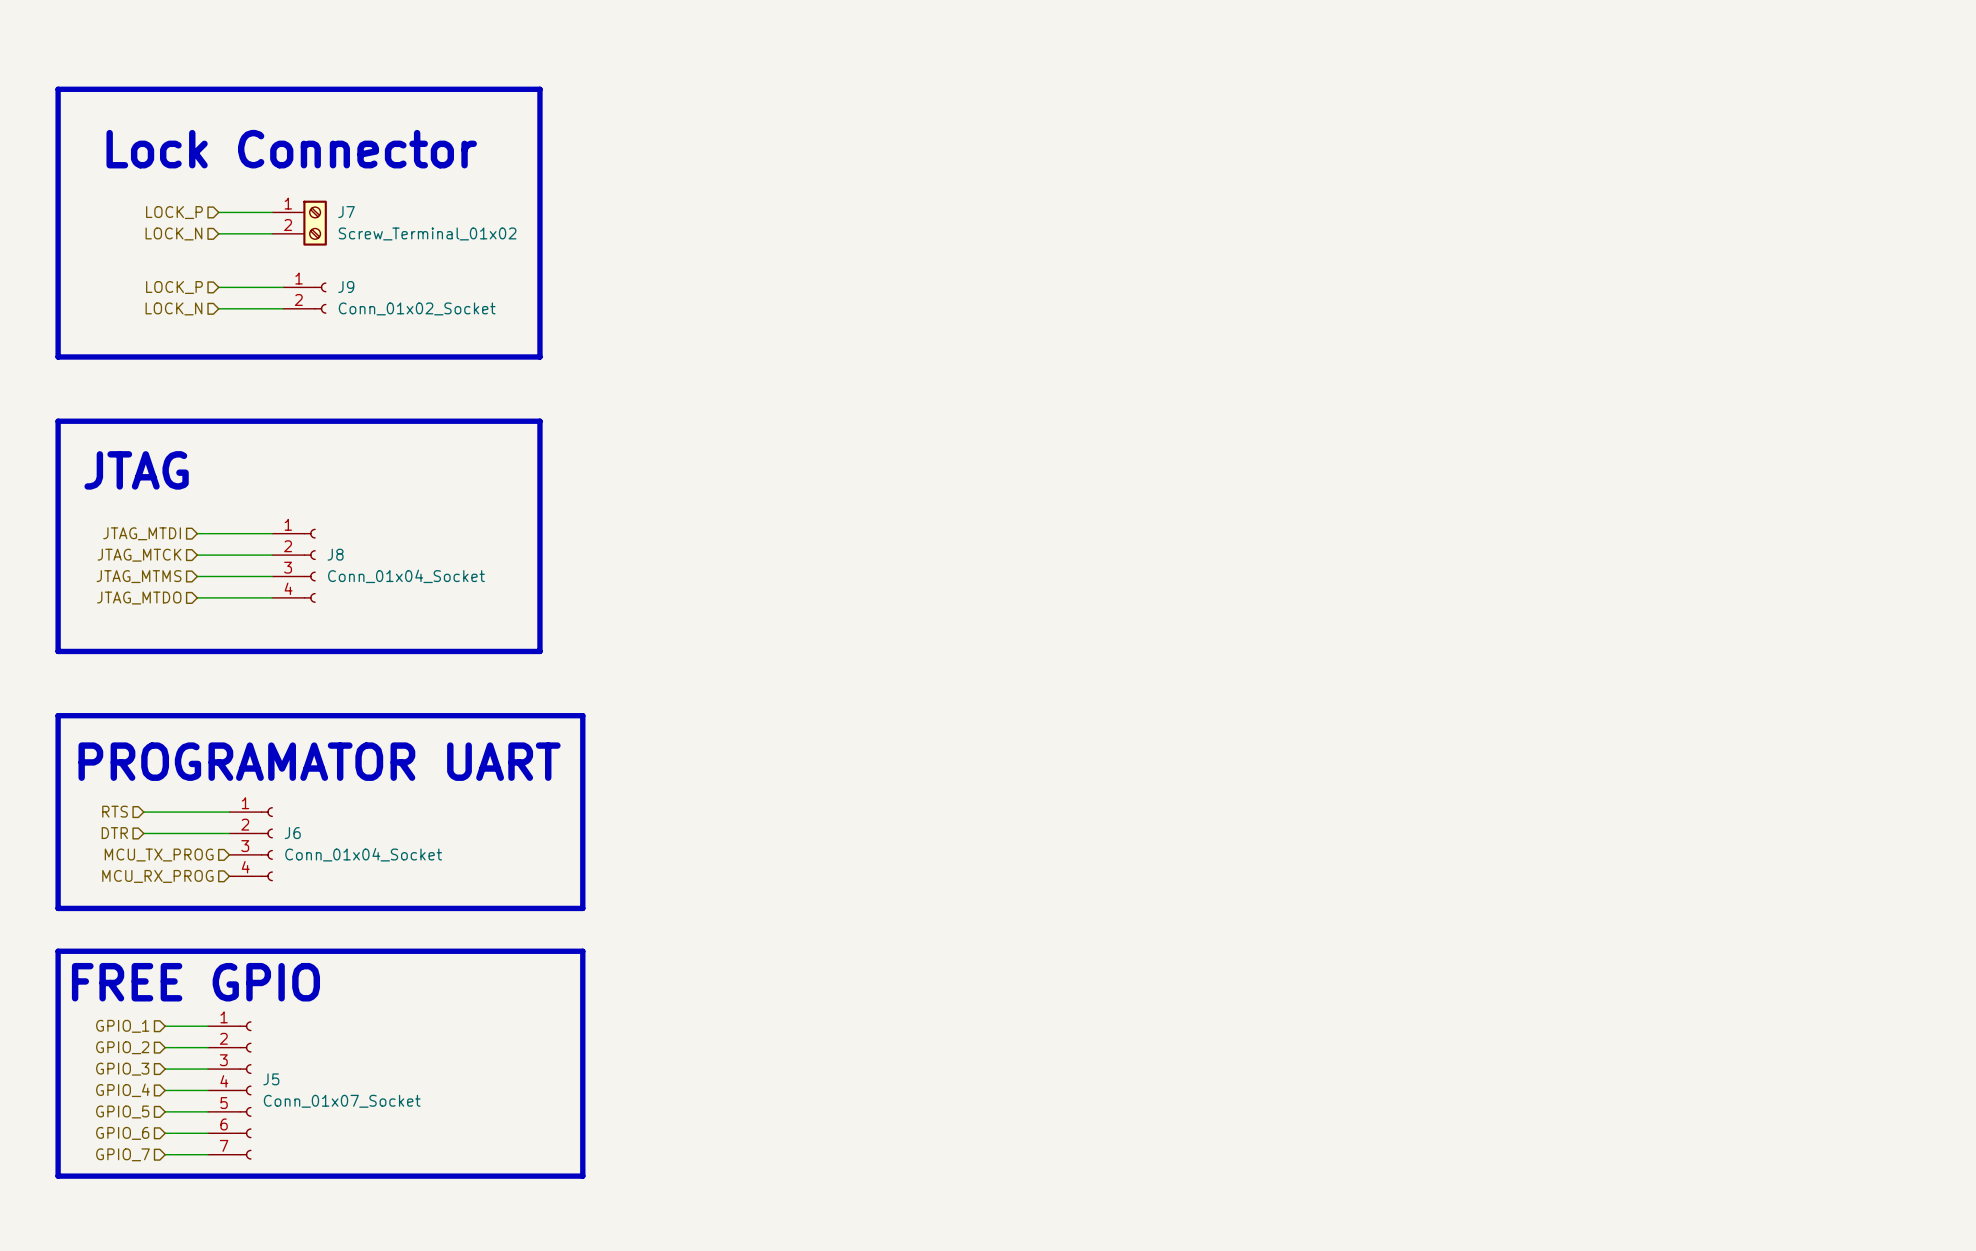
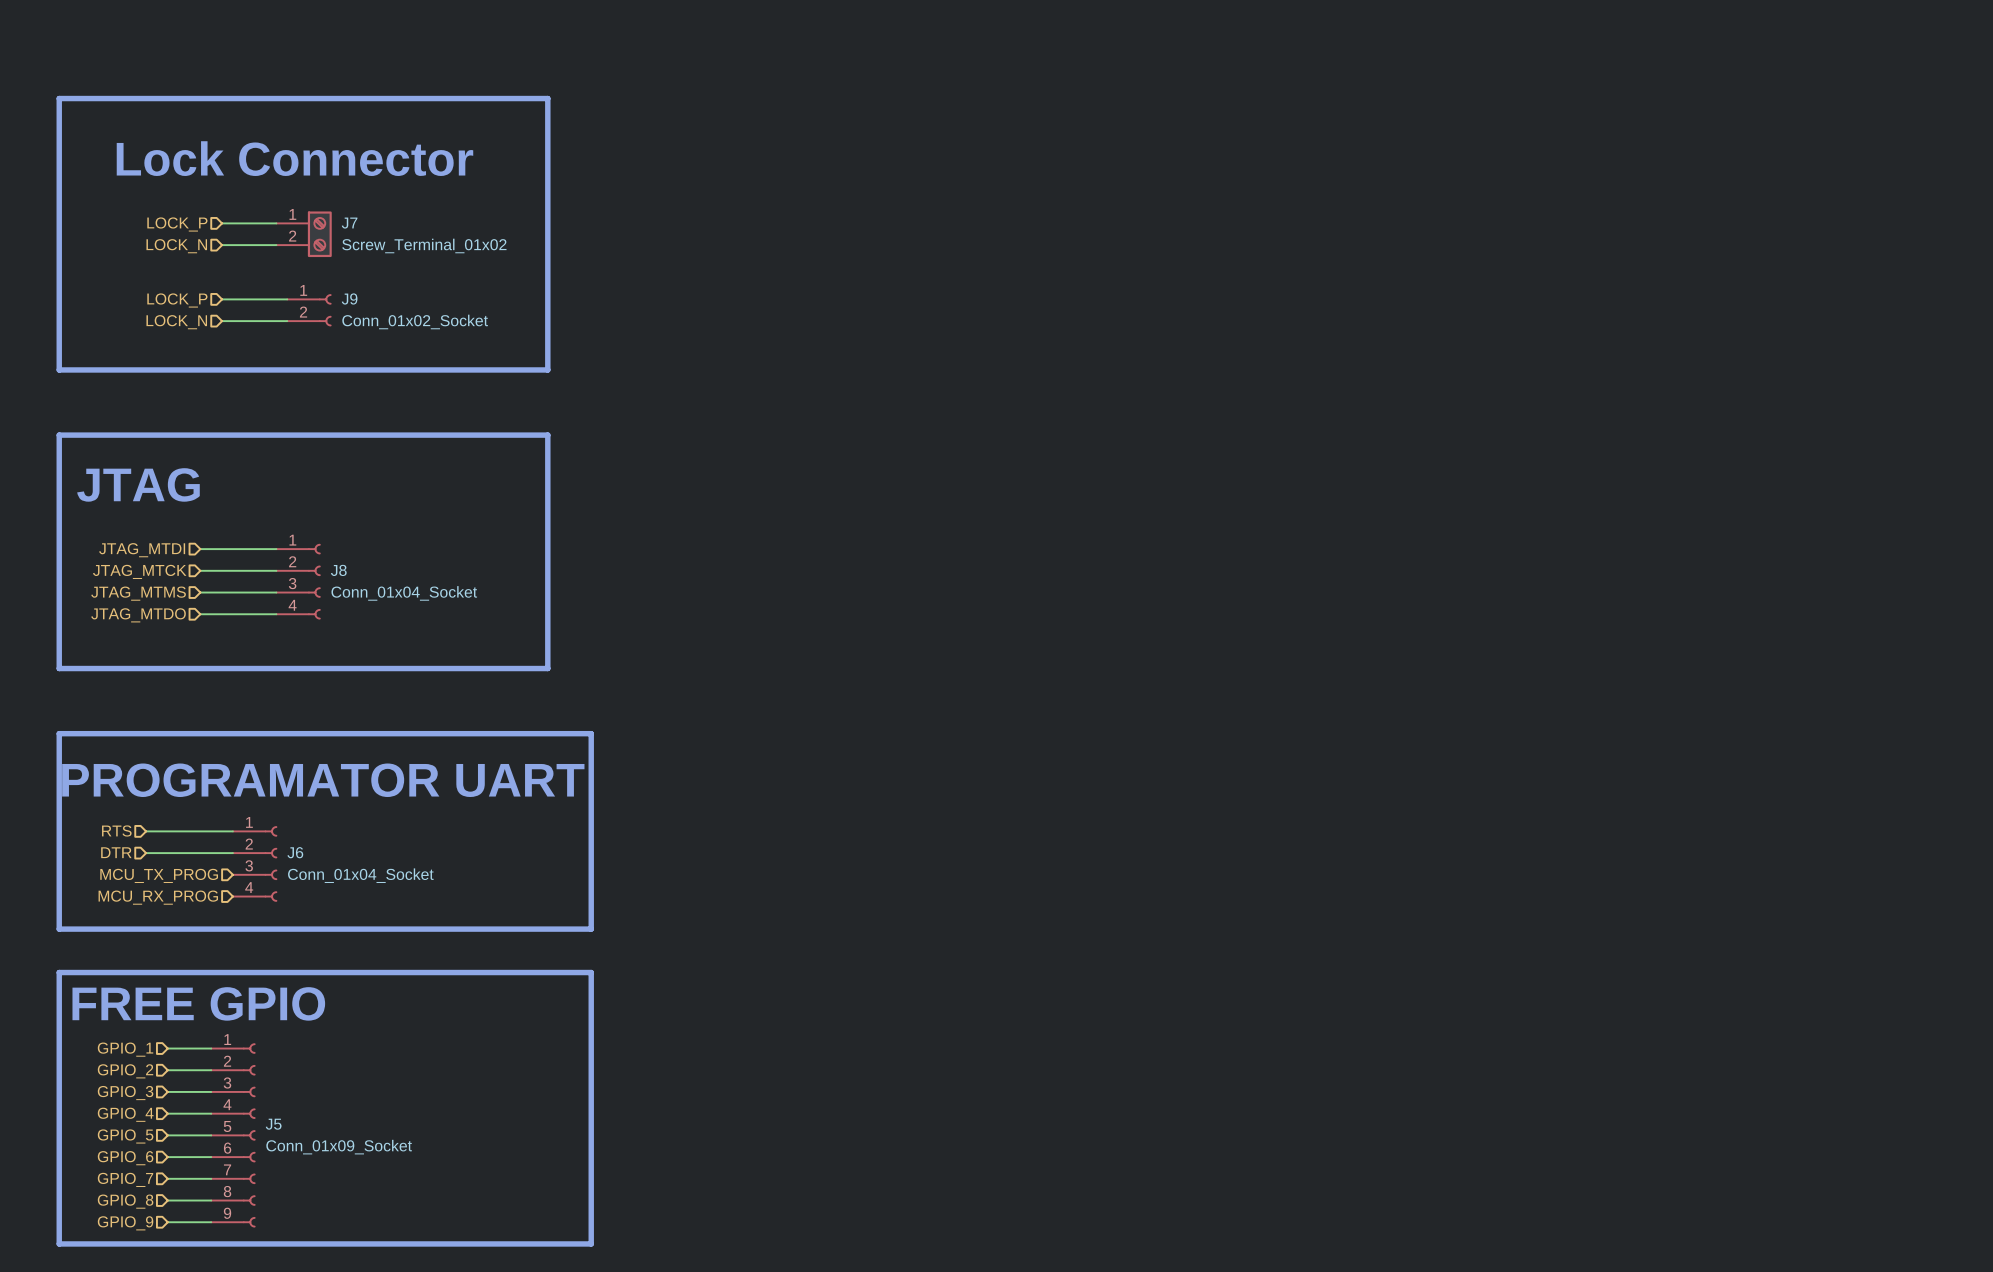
J5 symbol: [208, 1021, 252, 1160] -> [211, 1043, 256, 1228]
J5 value: Conn_01x07_Socket (342, 1101) -> Conn_01x09_Socket (339, 1147)
line: (58, 1176) (582, 1176) -> (59, 1200) (59, 1243) (591, 1243) (591, 1200)
hierarchical label: none -> GPIO_8 (125, 1201)
hierarchical label: none -> GPIO_9 (125, 1223)
wire: none -> (167, 1222) (211, 1222)

